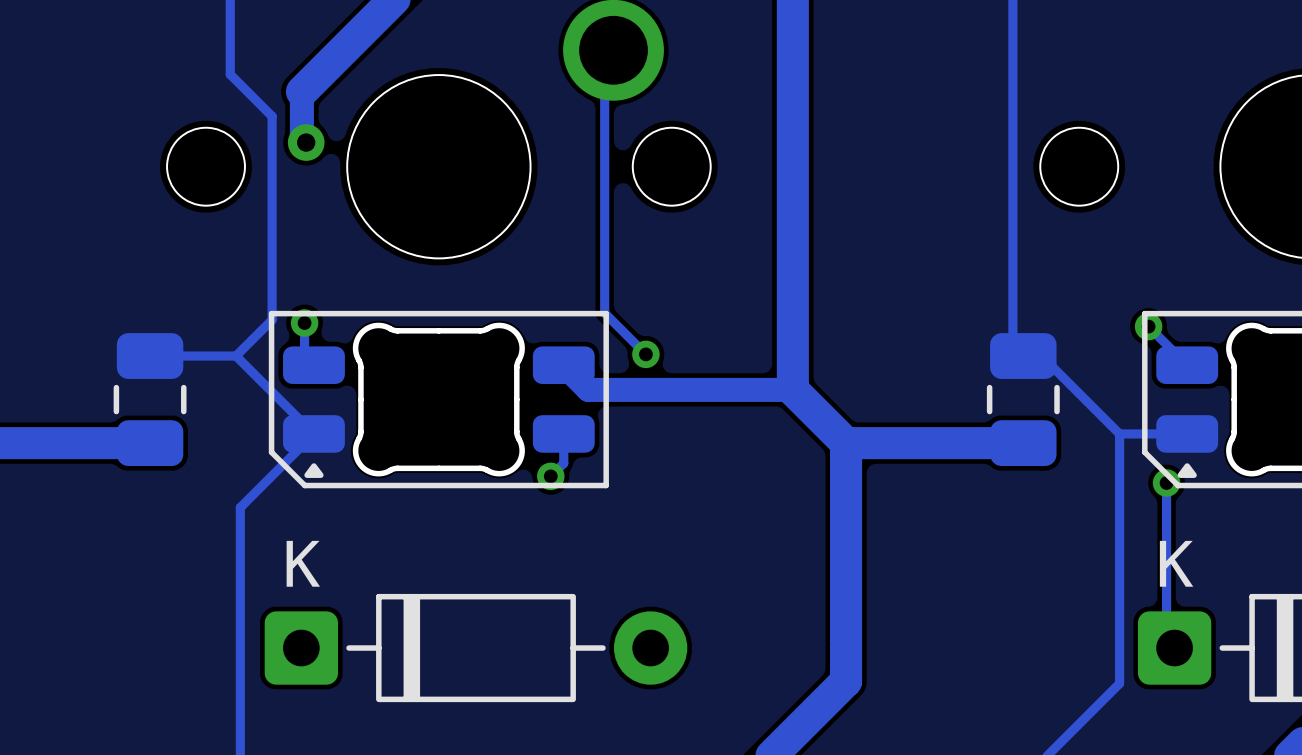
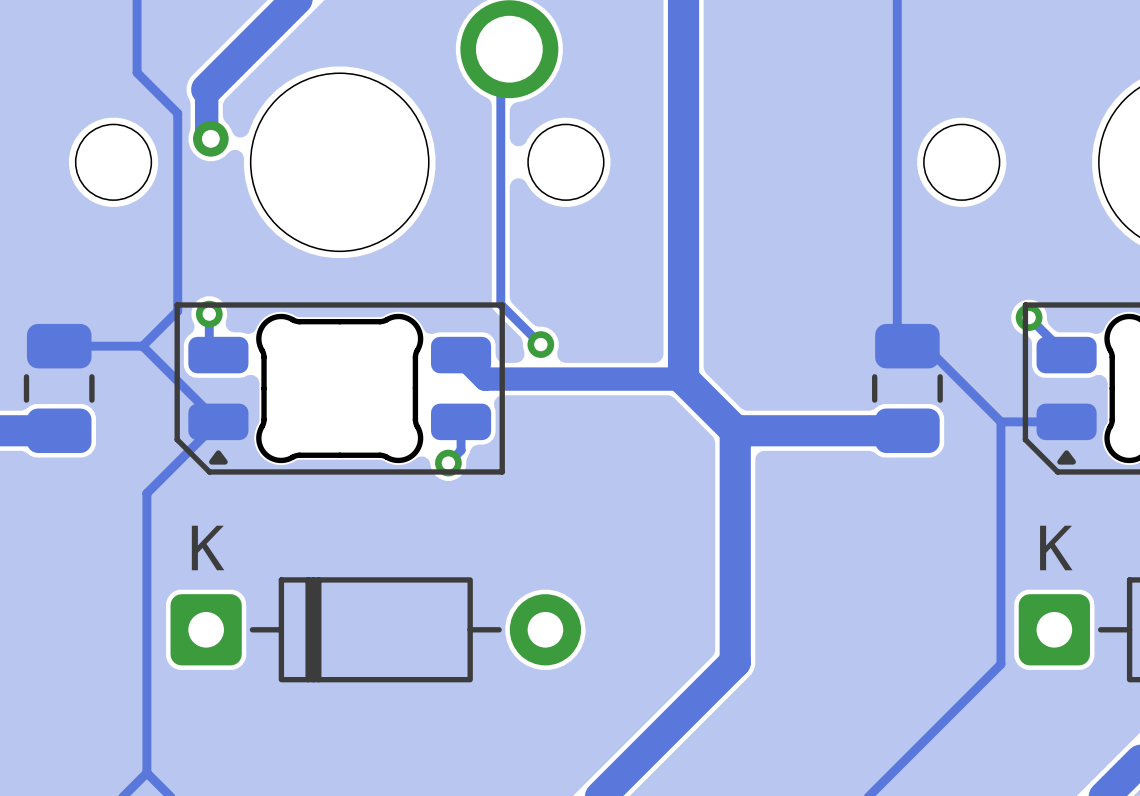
track: (1166, 483) (1166, 640) (1174, 648) -> none
via: (1166, 483) -> none

